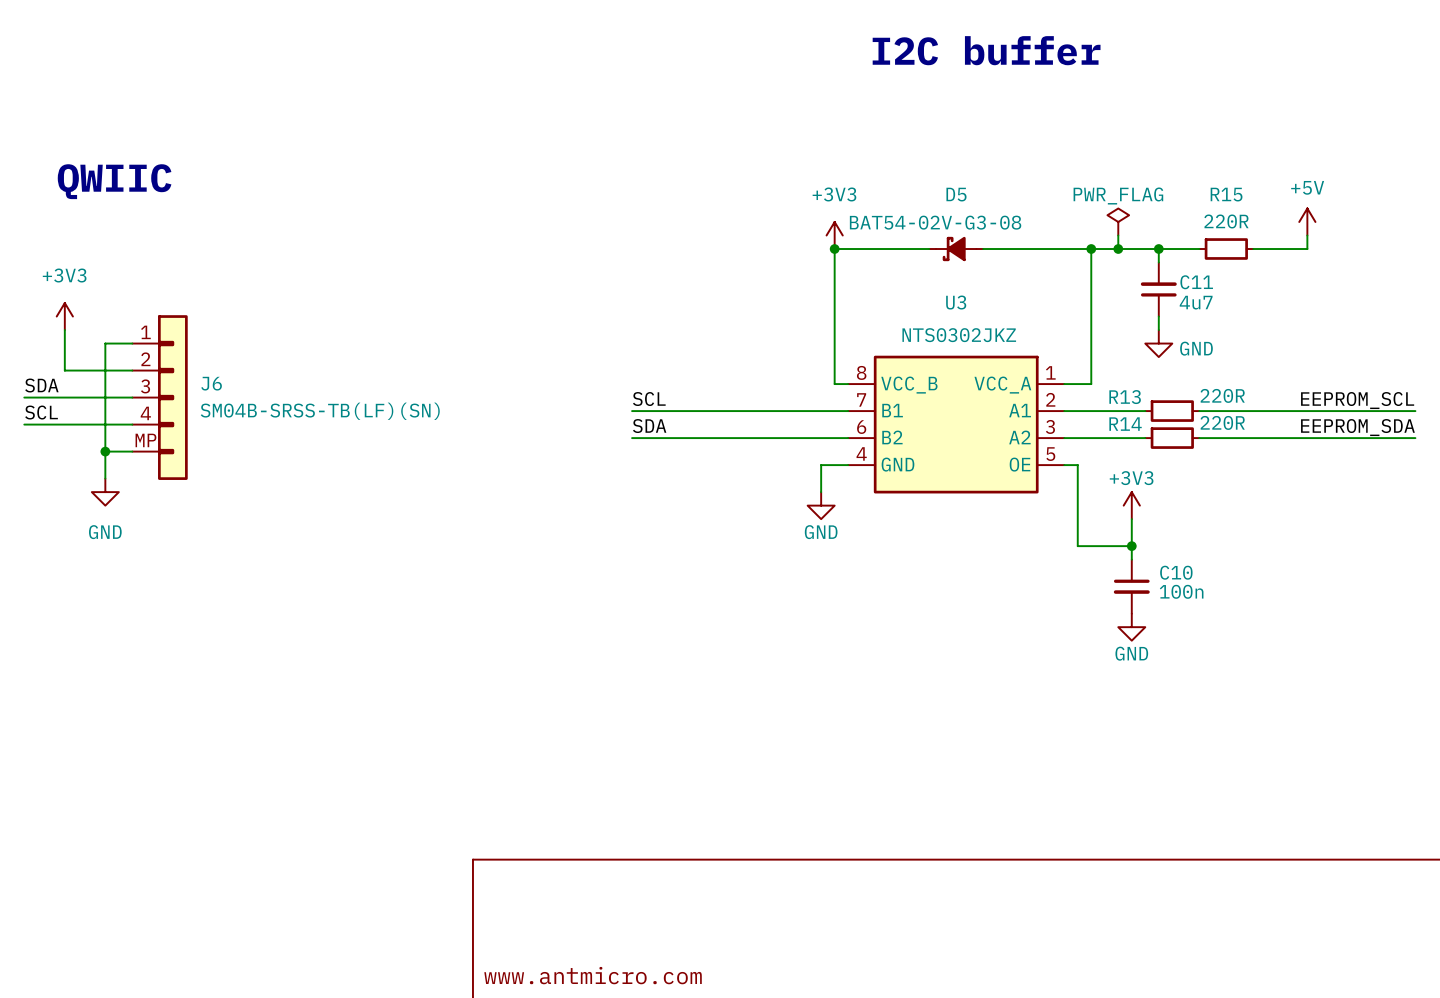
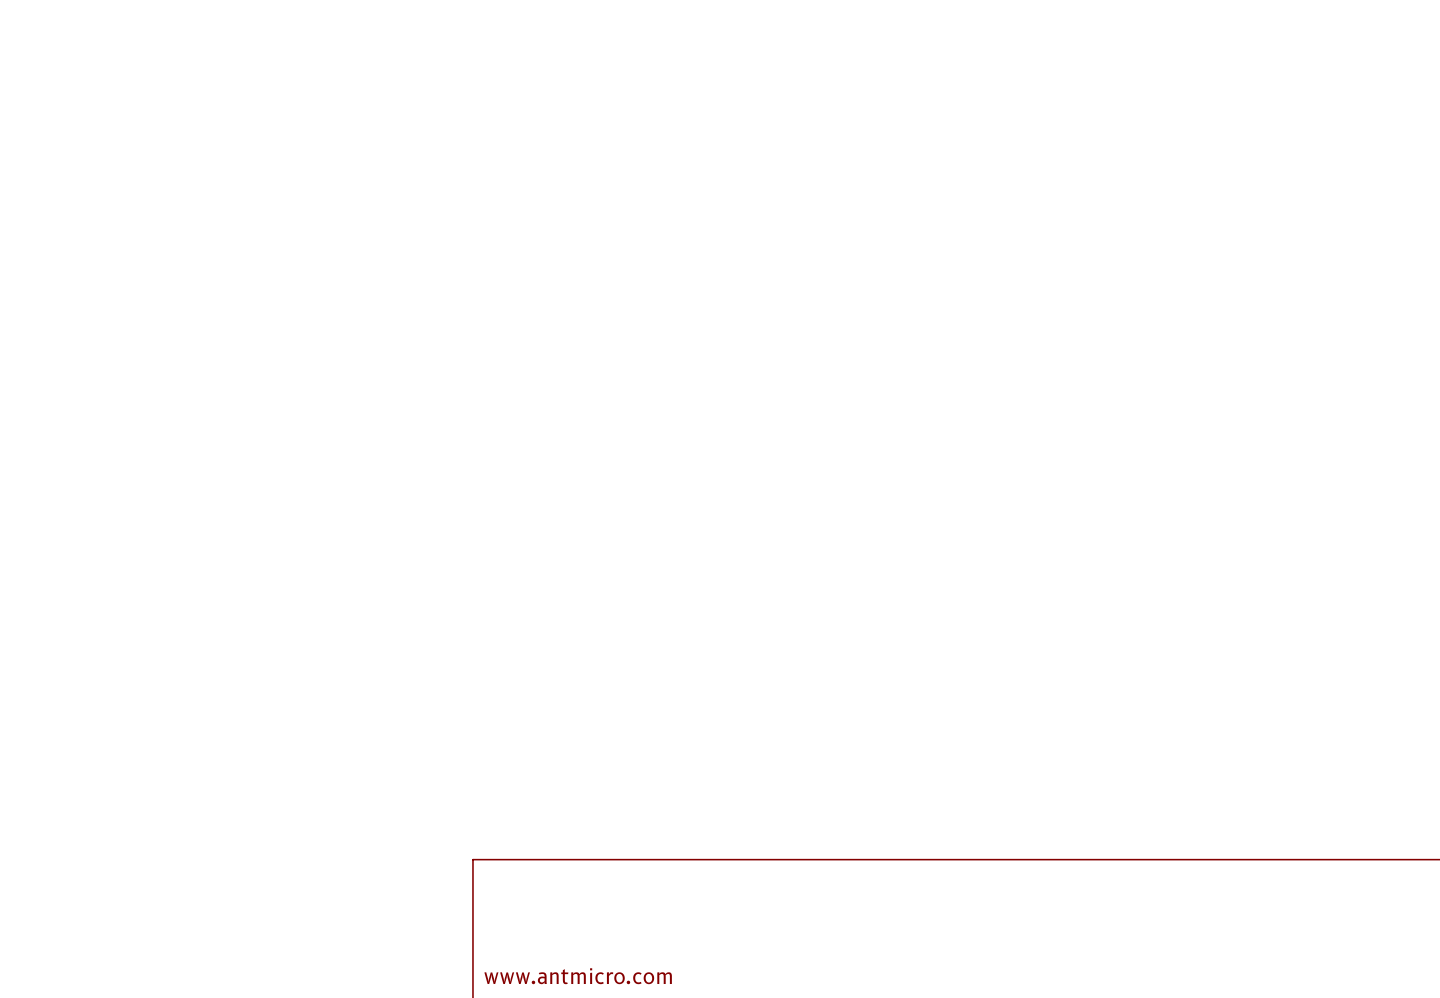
text: I2C buffer (986, 50) -> none
text: QWIIC (114, 181) -> none
power symbol: PWR_FLAG (1118, 221) -> none
power symbol: +5V (1307, 221) -> none
power symbol: +3V3 (834, 235) -> none
wire: (1118, 235) (1118, 249) -> none
wire: (1307, 235) (1307, 249) (1253, 249) -> none
junction: (834, 249) -> none
wire: (929, 249) (834, 249) (834, 384) (848, 384) -> none
D5: (956, 249) -> none
wire: (983, 249) (1199, 249) -> none
wire: (1091, 249) (1091, 384) (1064, 384) -> none
junction: (1091, 249) -> none
junction: (1118, 249) -> none
wire: (1158, 249) (1158, 262) -> none
junction: (1158, 249) -> none
R15: (1226, 249) -> none
C11: (1158, 289) -> none
power symbol: +3V3 (64, 316) -> none
wire: (1158, 316) (1158, 330) -> none
wire: (64, 330) (64, 370) (132, 370) -> none
wire: (132, 343) (105, 343) (105, 478) -> none
power symbol: GND (1158, 343) -> none
label: SDA (41, 385) -> none
wire: (24, 397) (132, 397) -> none
J6: (160, 397) -> none
label: SCL (649, 399) -> none
label: EEPROM_SCL (1357, 400) -> none
wire: (632, 411) (848, 411) -> none
wire: (1064, 411) (1145, 411) -> none
R13: (1172, 411) -> none
wire: (1199, 411) (1415, 411) -> none
label: SCL (41, 412) -> none
wire: (24, 424) (132, 424) -> none
U3: (956, 424) -> none
label: SDA (649, 426) -> none
label: EEPROM_SDA (1357, 427) -> none
wire: (632, 438) (848, 438) -> none
wire: (1064, 438) (1145, 438) -> none
R14: (1172, 438) -> none
wire: (1199, 438) (1415, 438) -> none
wire: (105, 451) (132, 451) -> none
junction: (105, 451) -> none
wire: (848, 465) (821, 465) (821, 492) -> none
wire: (1064, 465) (1077, 465) (1077, 546) (1131, 546) -> none
power symbol: GND (105, 492) -> none
power symbol: GND (821, 505) -> none
power symbol: +3V3 (1131, 505) -> none
wire: (1131, 519) (1131, 559) -> none
junction: (1131, 546) -> none
C10: (1131, 586) -> none
power symbol: GND (1131, 627) -> none

